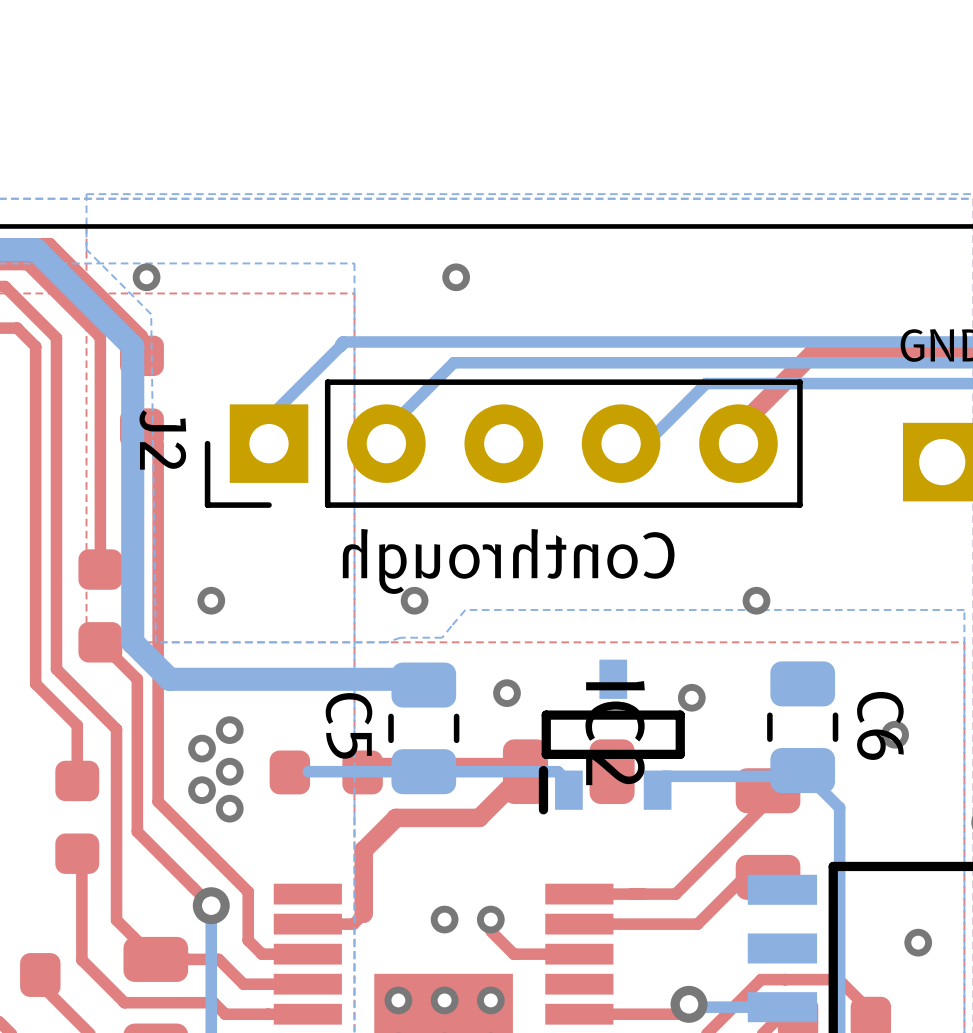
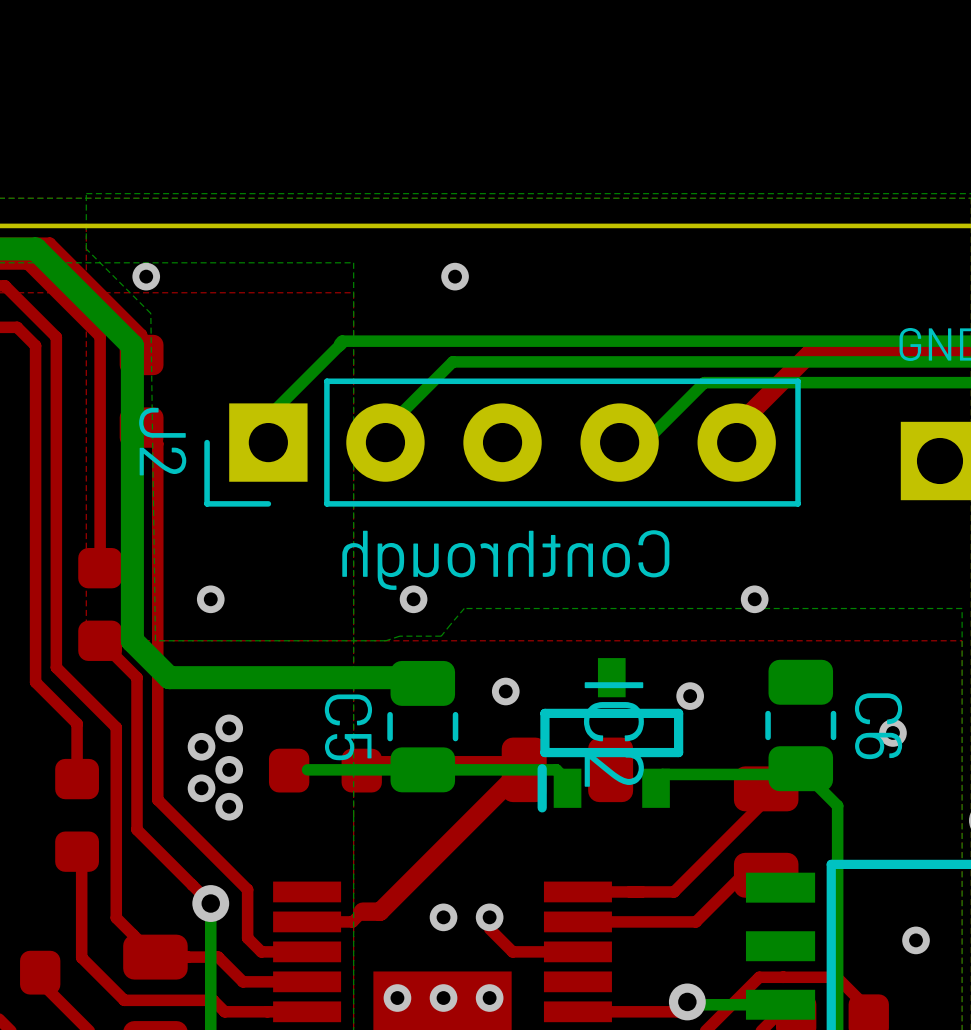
top track: (525, 771) (479, 817) (396, 817) (363, 850) (363, 913) -> (524, 769) (521, 769) (380, 911) (362, 911)

